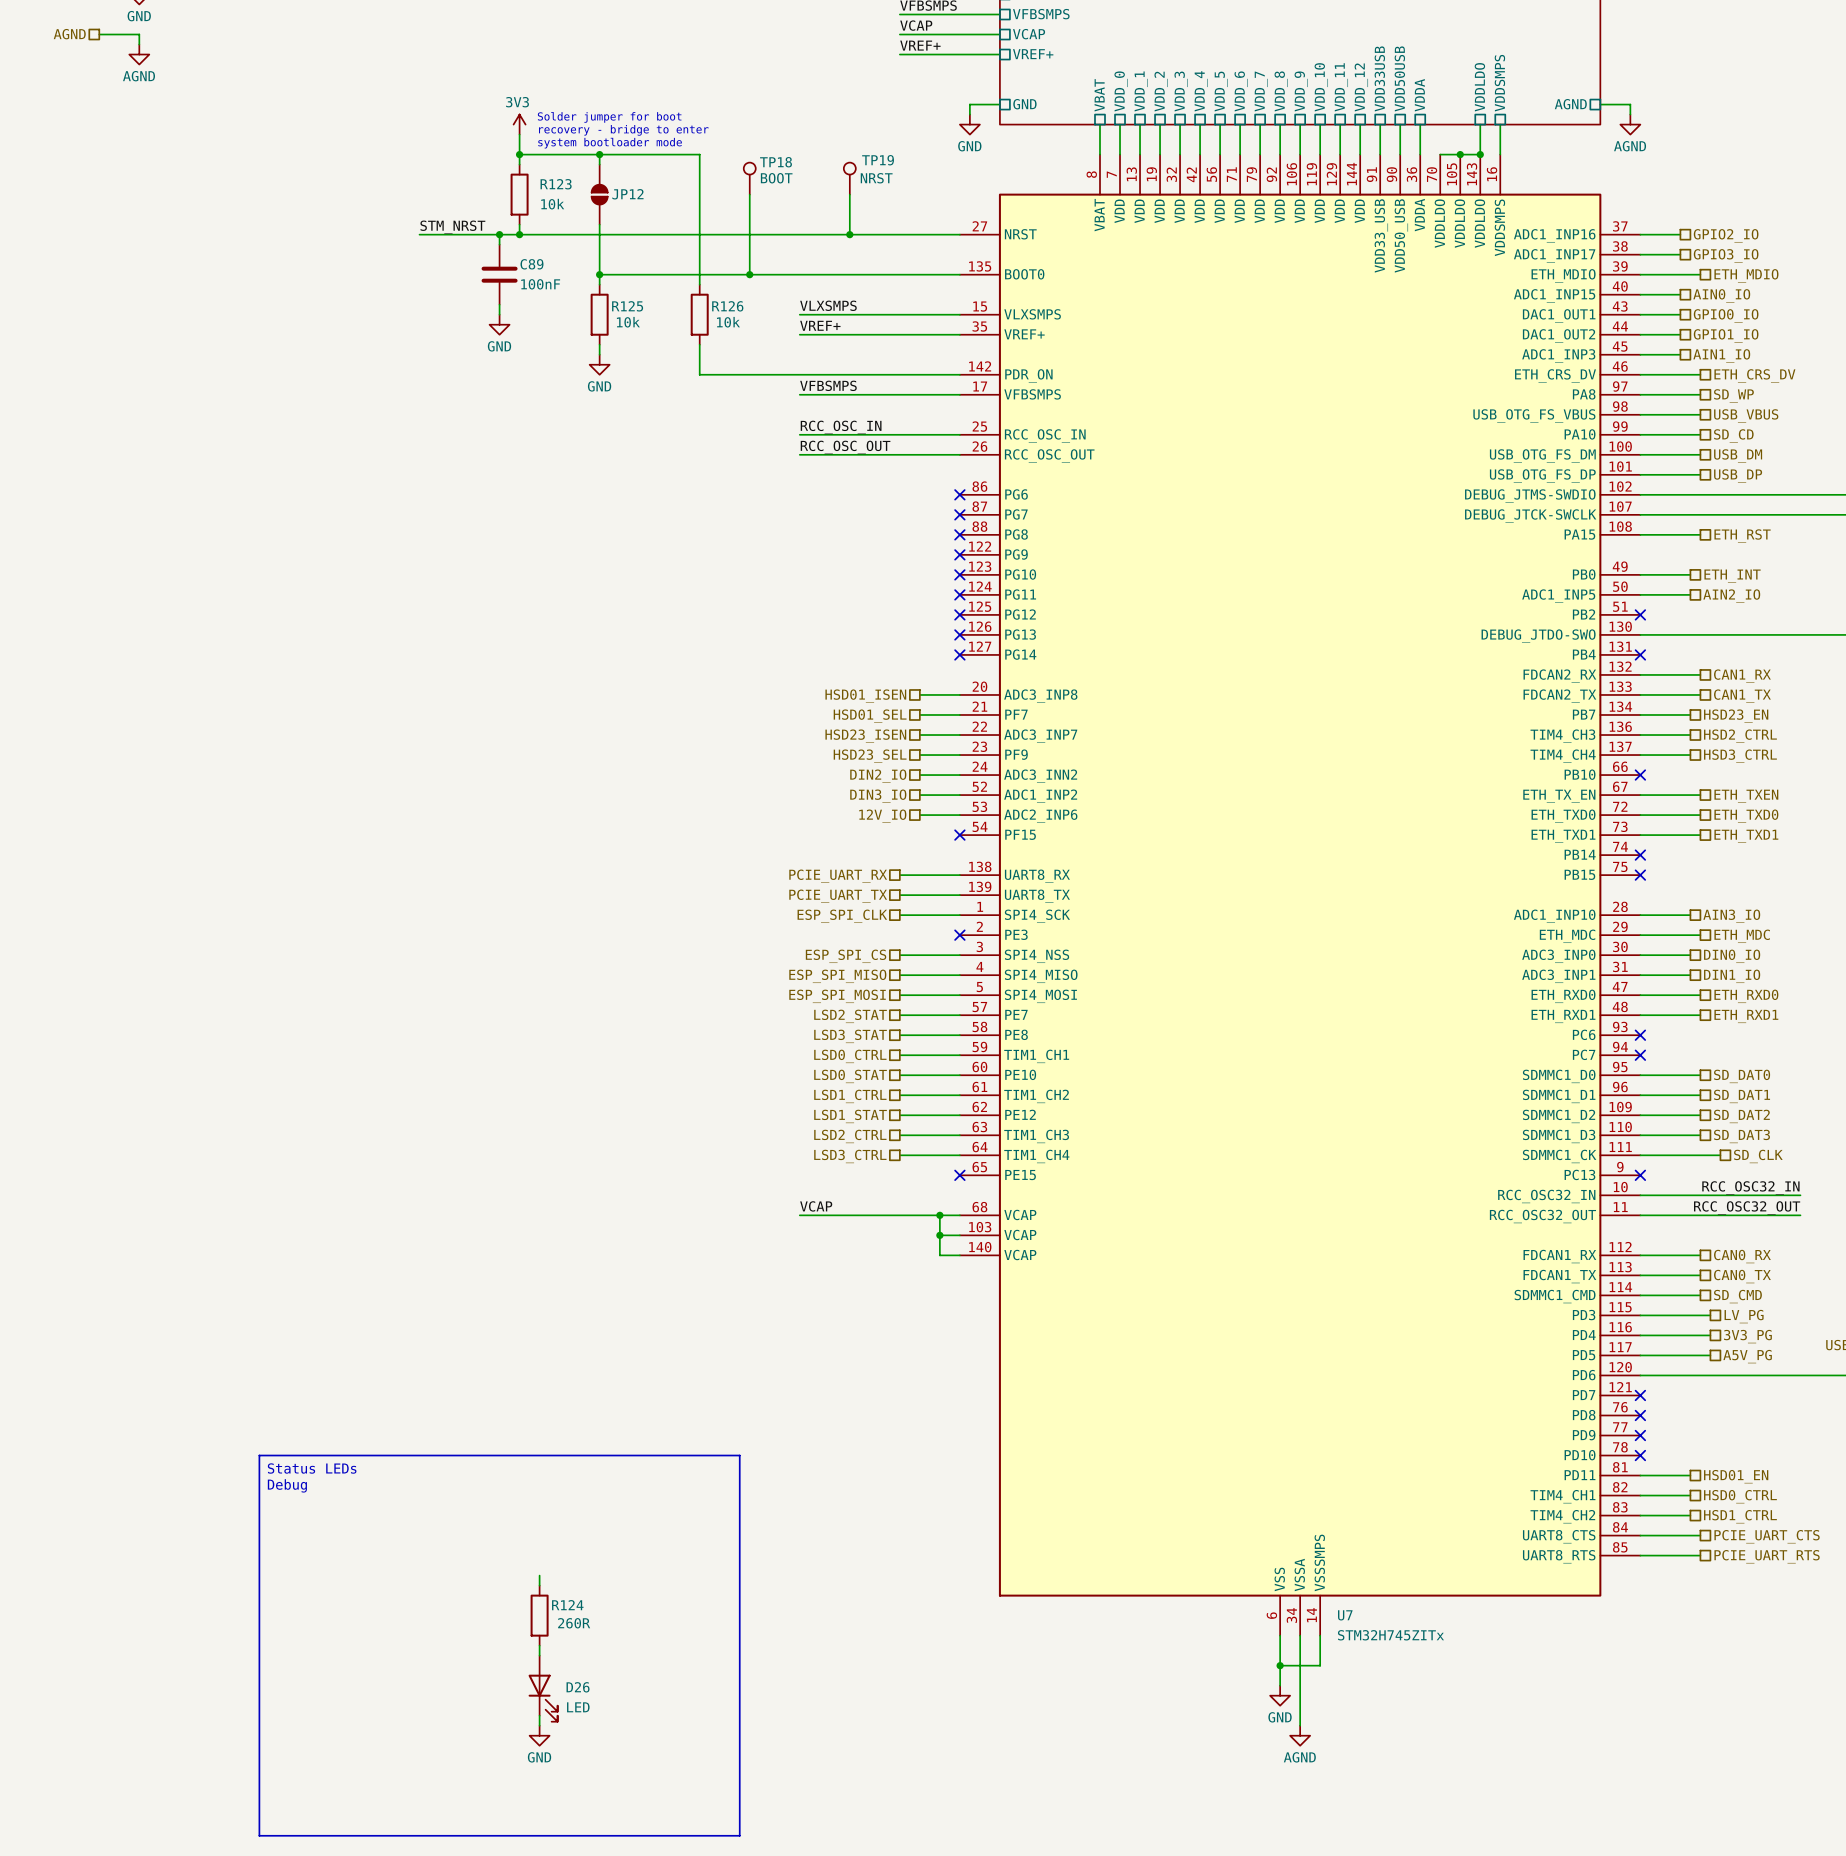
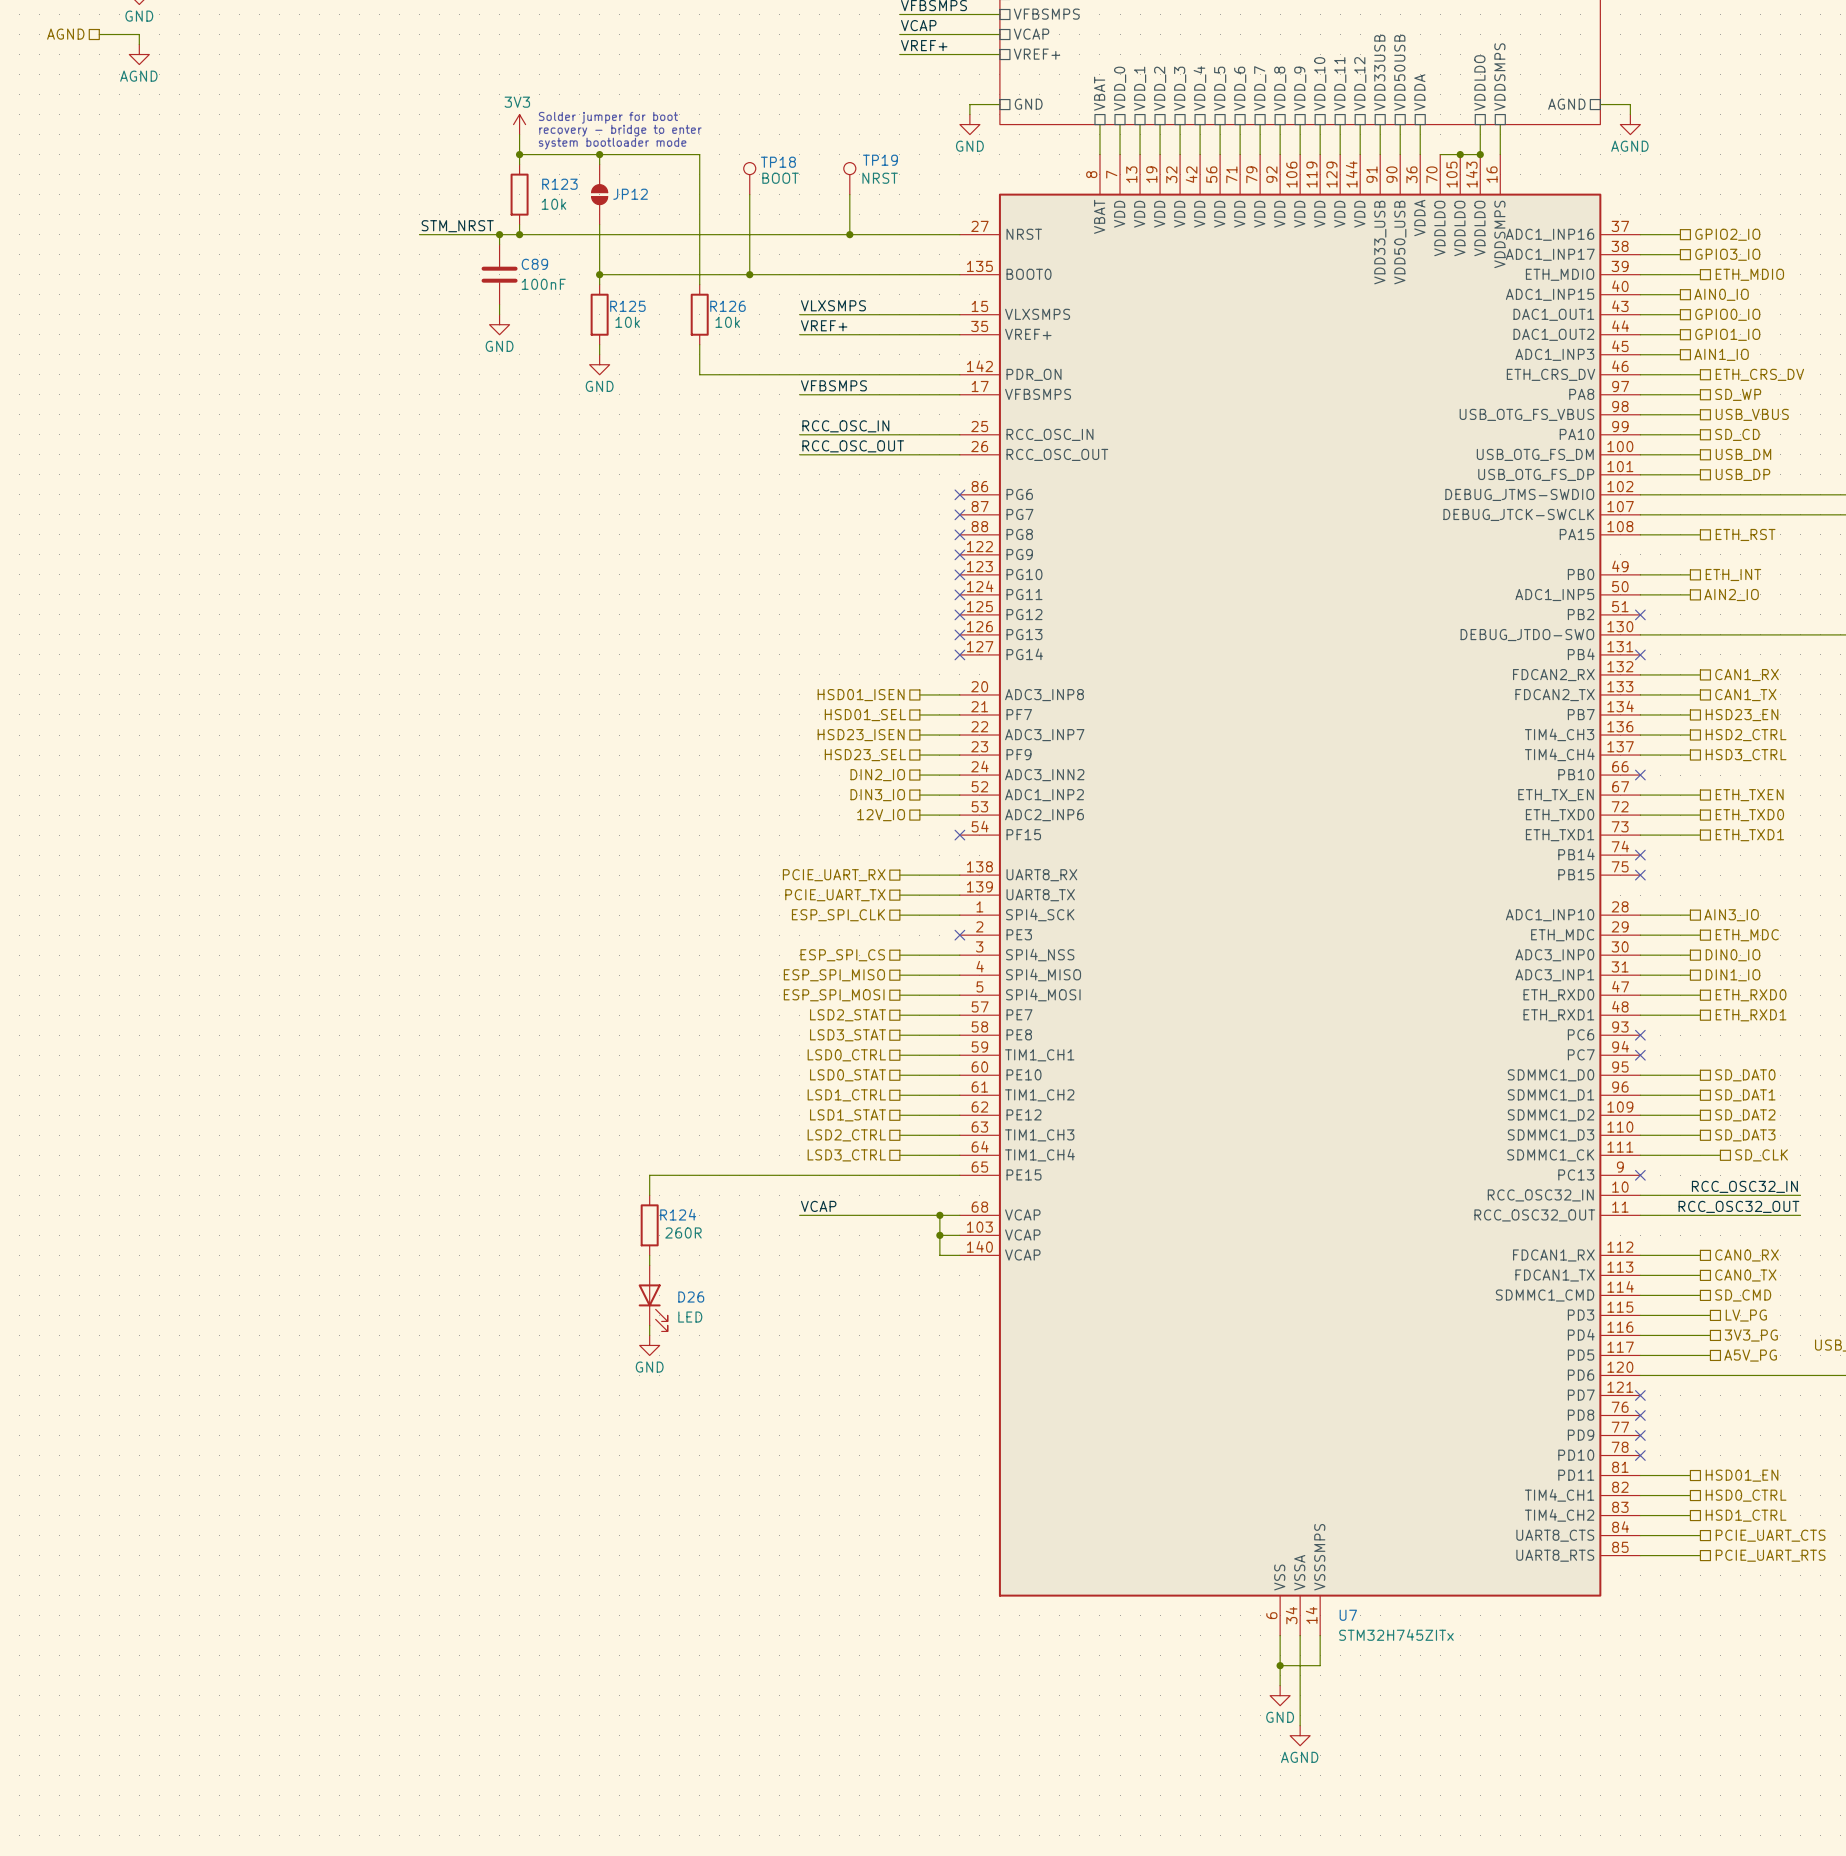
wire: none -> (959, 1175) (649, 1175) (649, 1195)
no-connect mark: (959, 1175) -> none
wire: none -> (649, 1255) (649, 1265)
wire: none -> (649, 1325) (649, 1335)
power symbol: none -> GND (649, 1345)
line: (259, 1455) (739, 1455) (739, 1835) (259, 1835) (259, 1455) -> none
text: Status LEDs (312, 1468) -> none
text: Debug (287, 1485) -> none
wire: (539, 1575) (539, 1585) -> none
R124 position: (539, 1615) -> (649, 1225)
wire: (539, 1645) (539, 1655) -> none
D26 position: (543, 1688) -> (653, 1298)
wire: (539, 1715) (539, 1725) -> none
power symbol: GND (539, 1735) -> none

